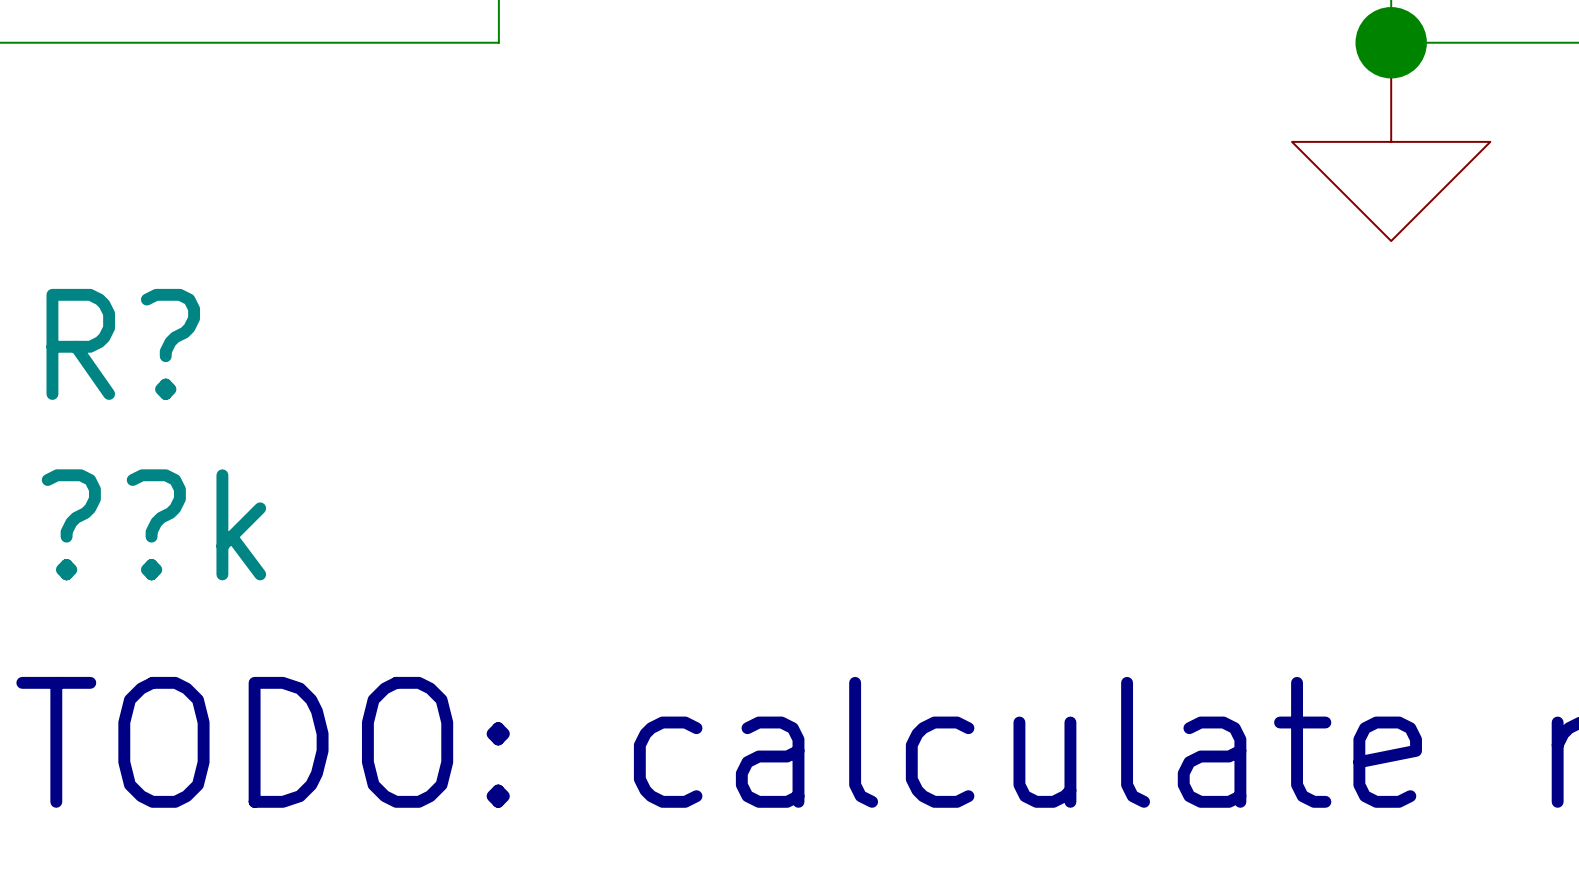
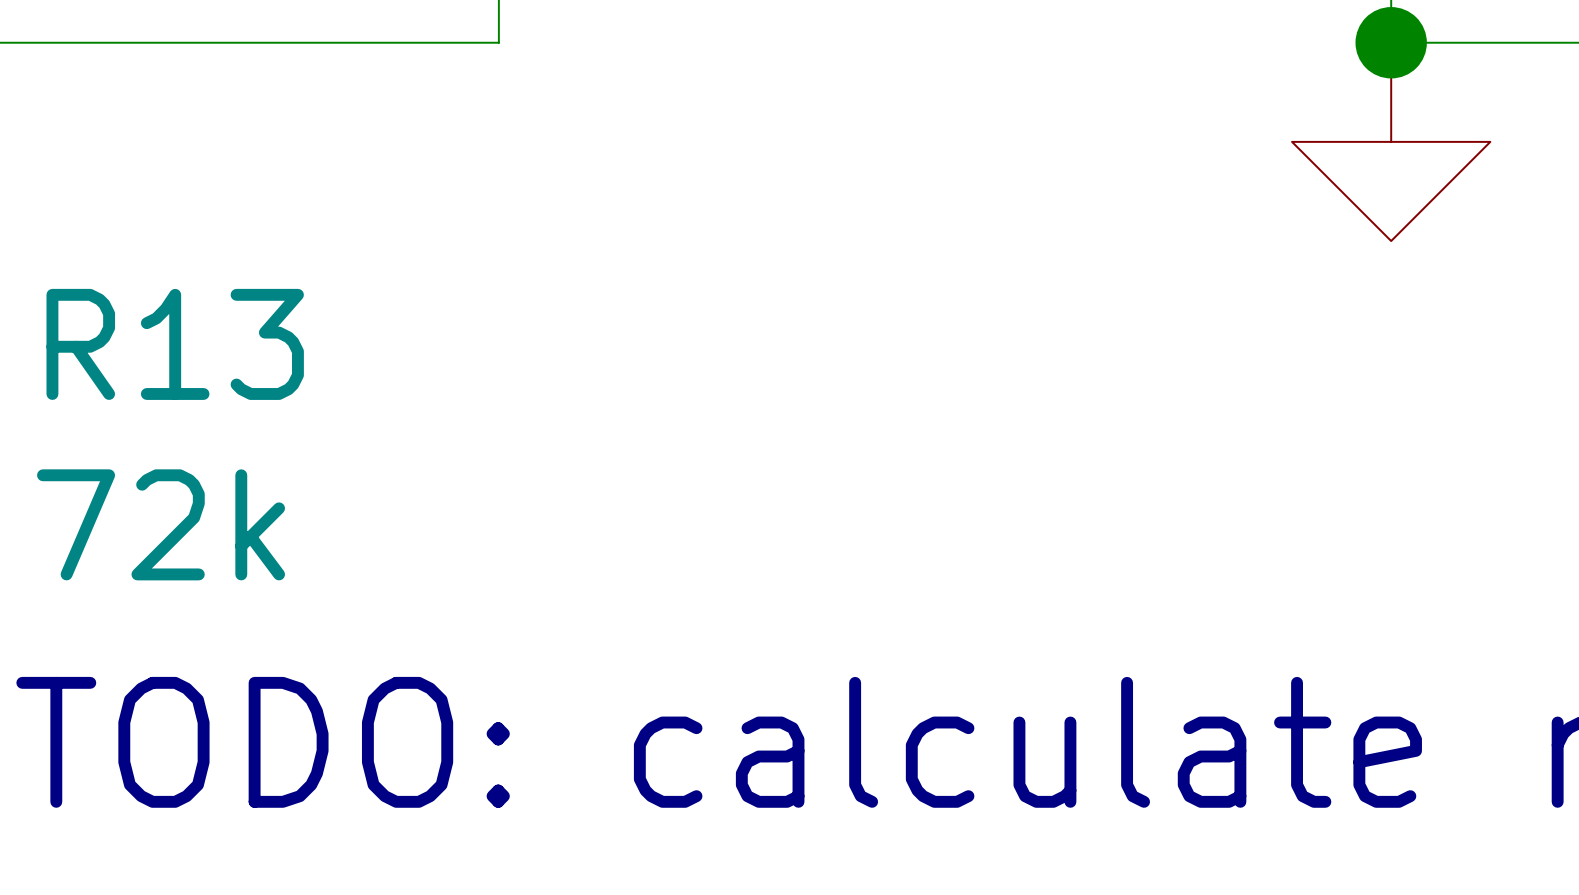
R? name: R? (123, 344) -> R13 (175, 344)
R? value: ??k (153, 524) -> 72k (161, 524)

